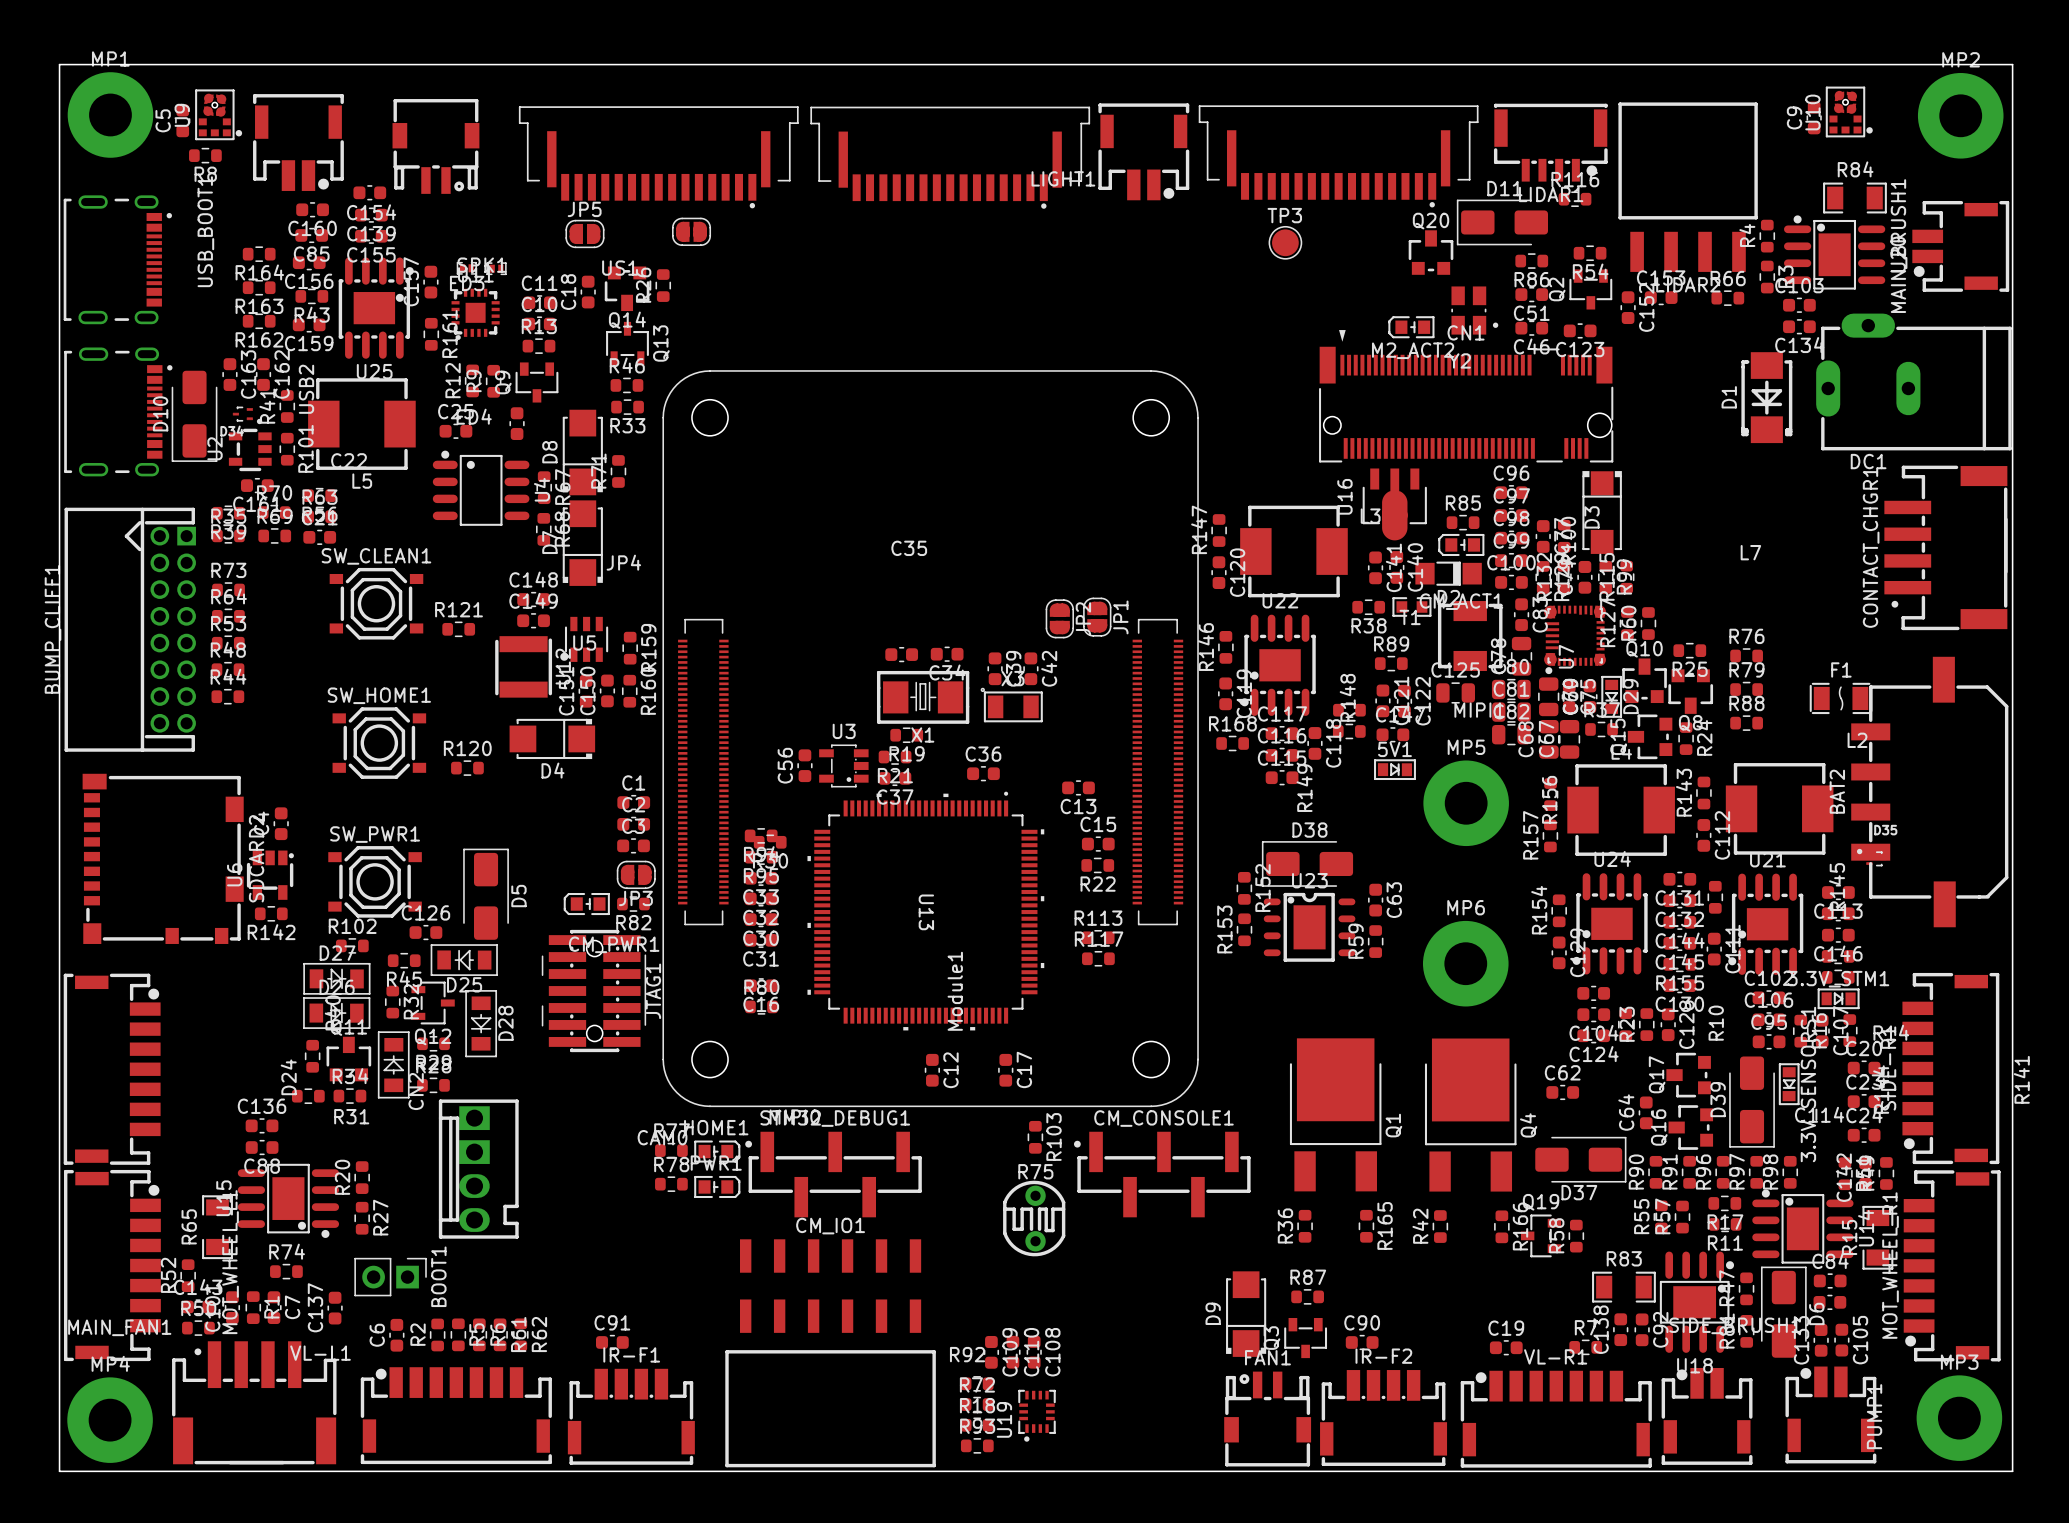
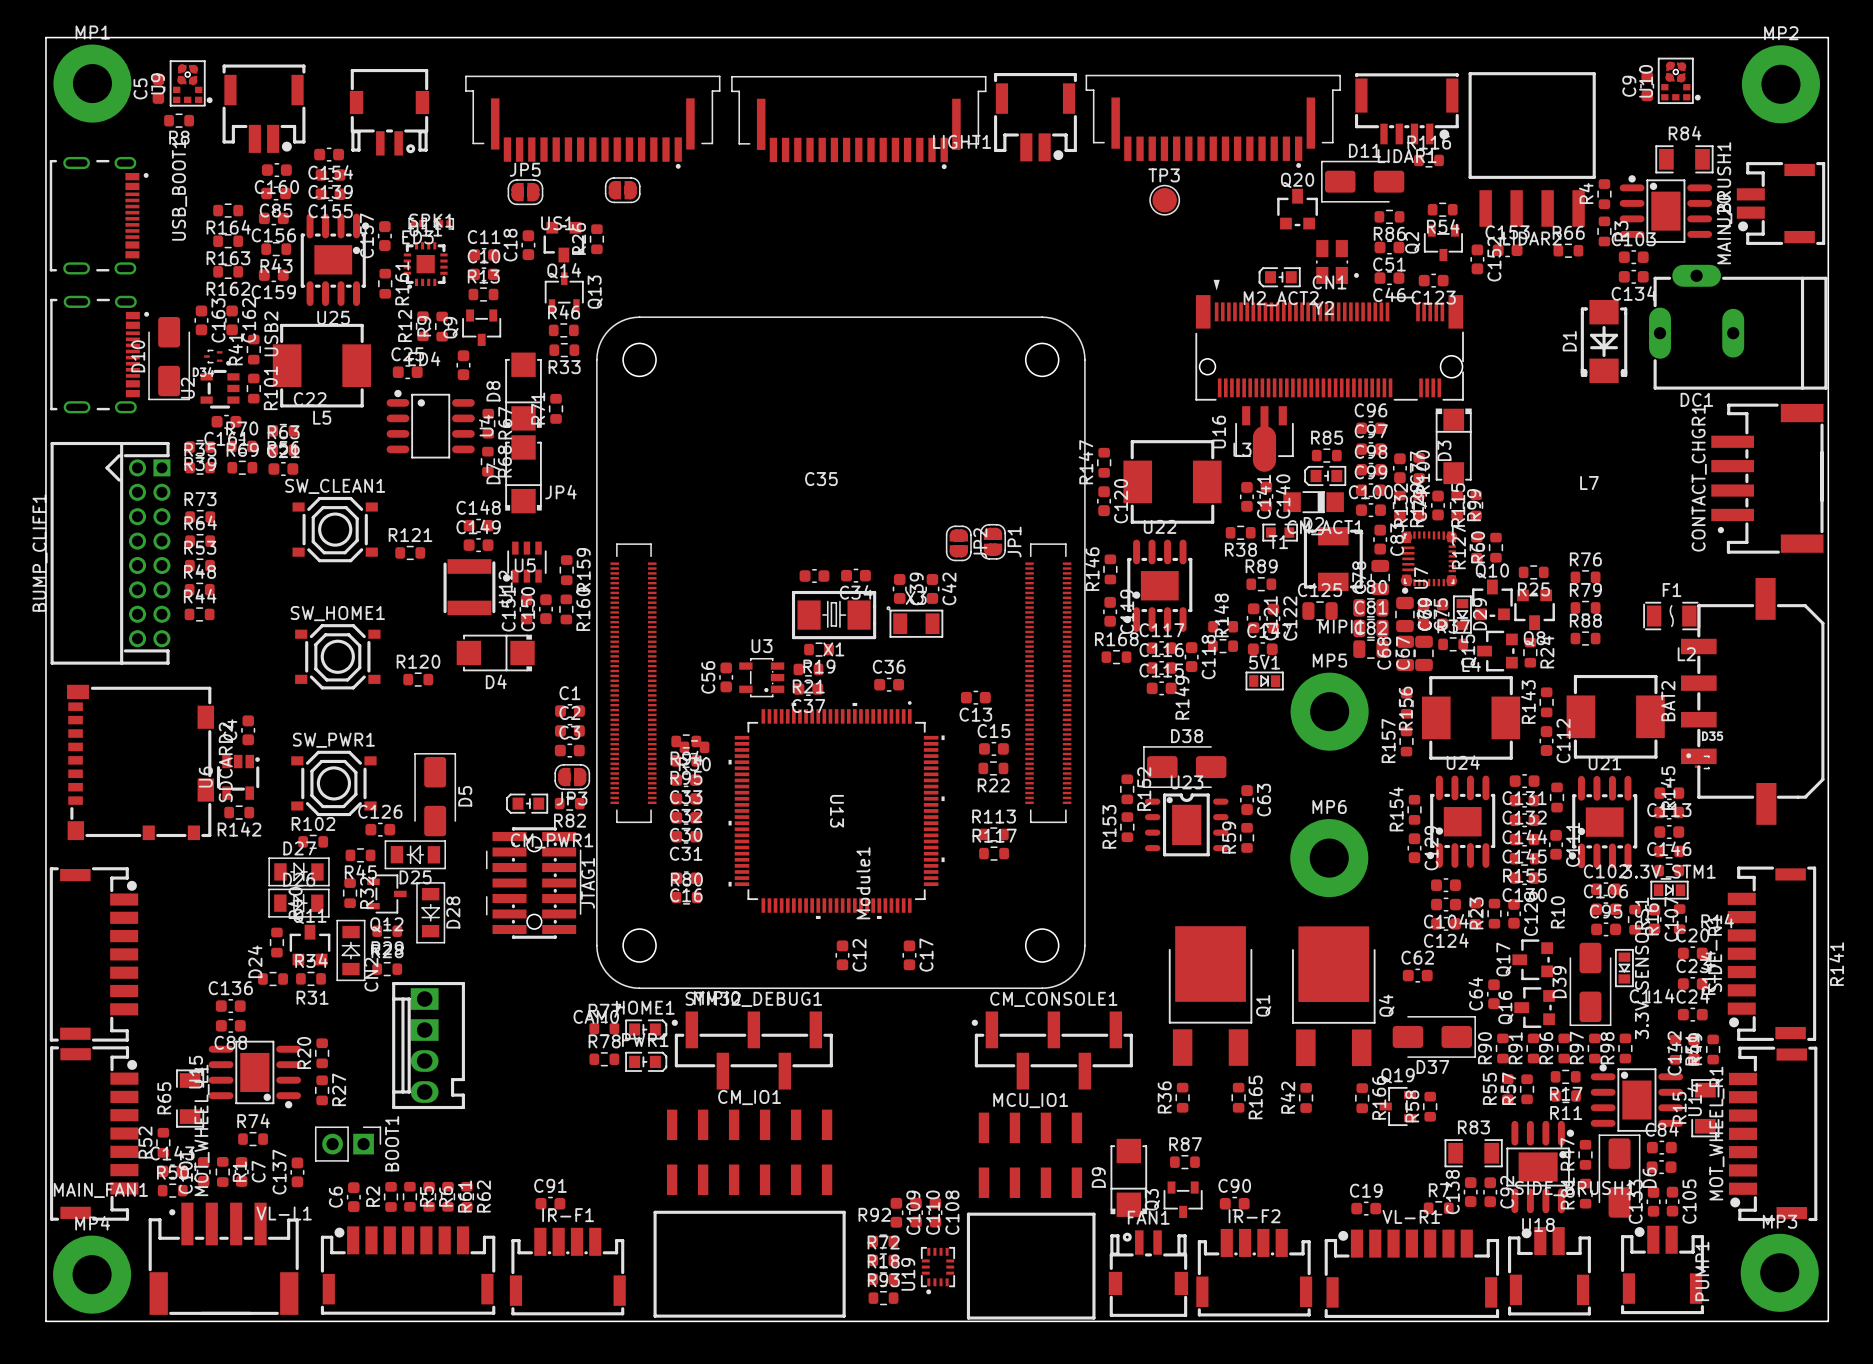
R103: (1035, 1137) -> none
R75: (1034, 1218) -> none
MCU_IO1: none -> (1031, 1216)

